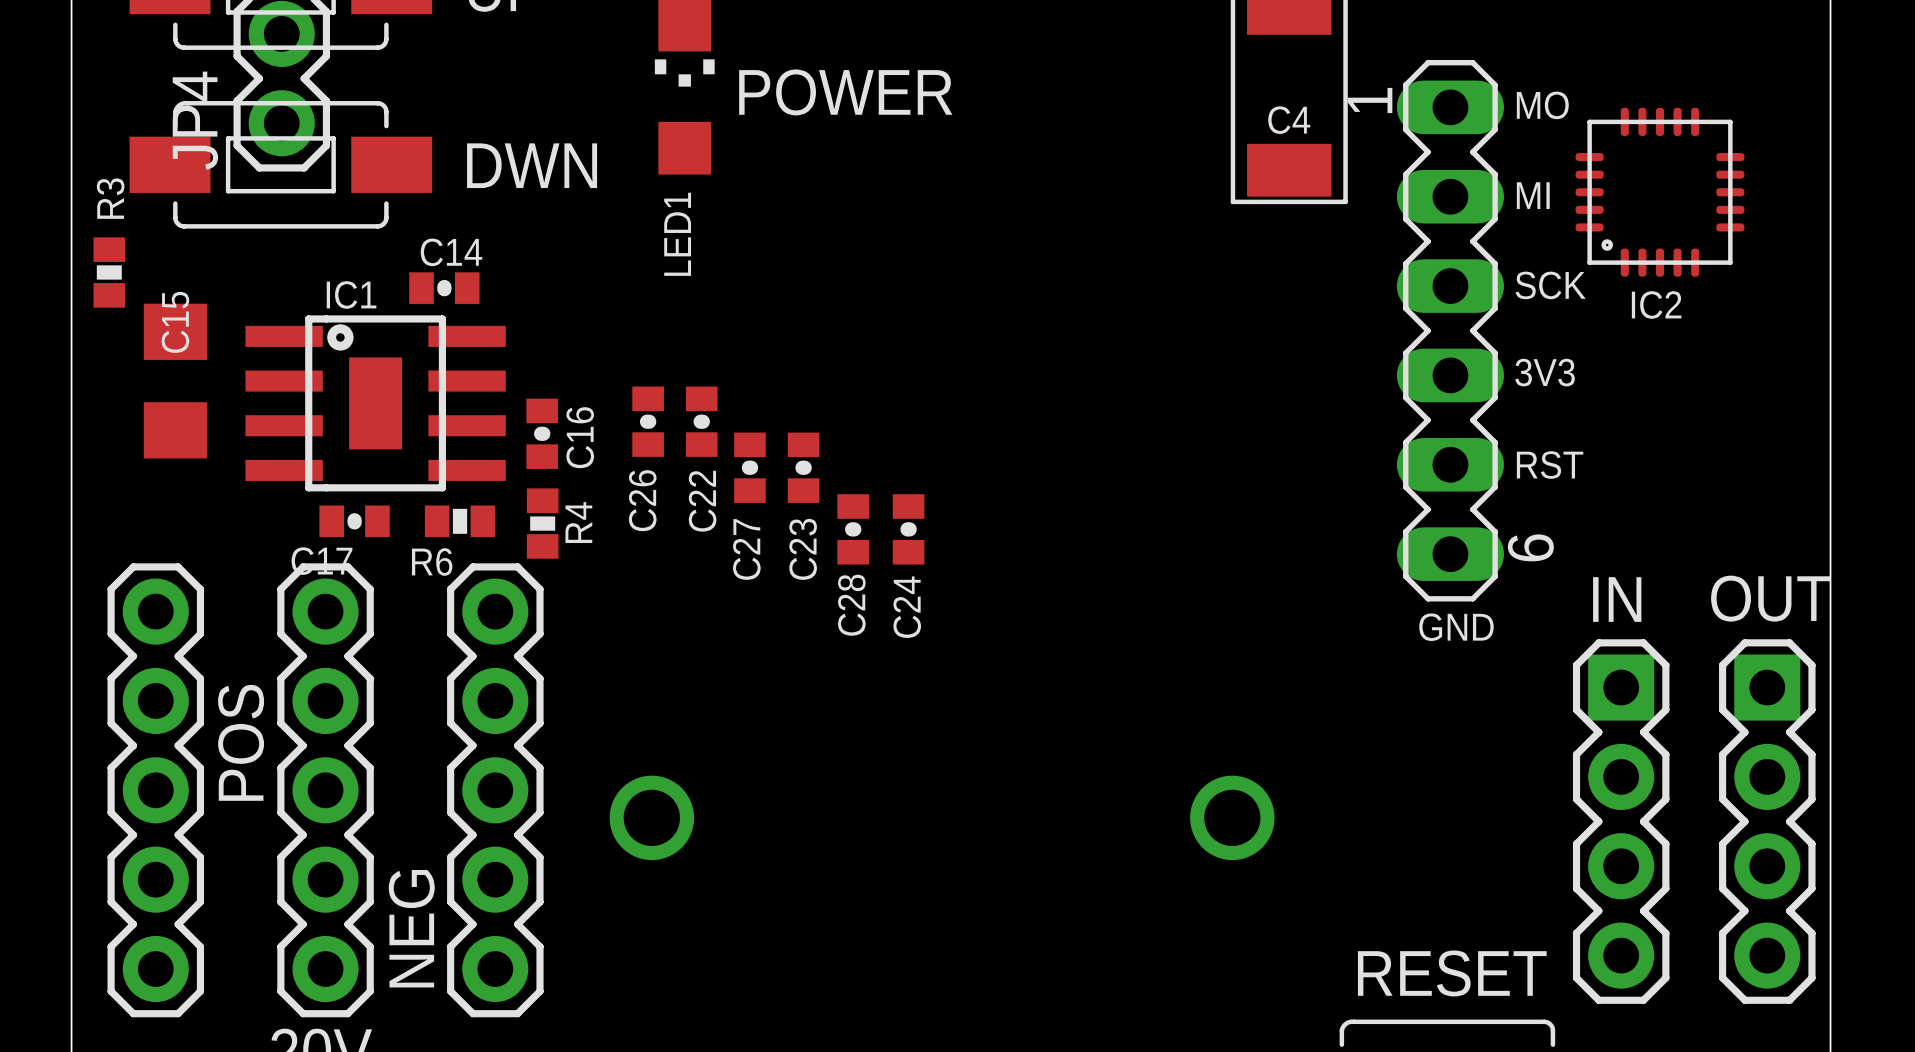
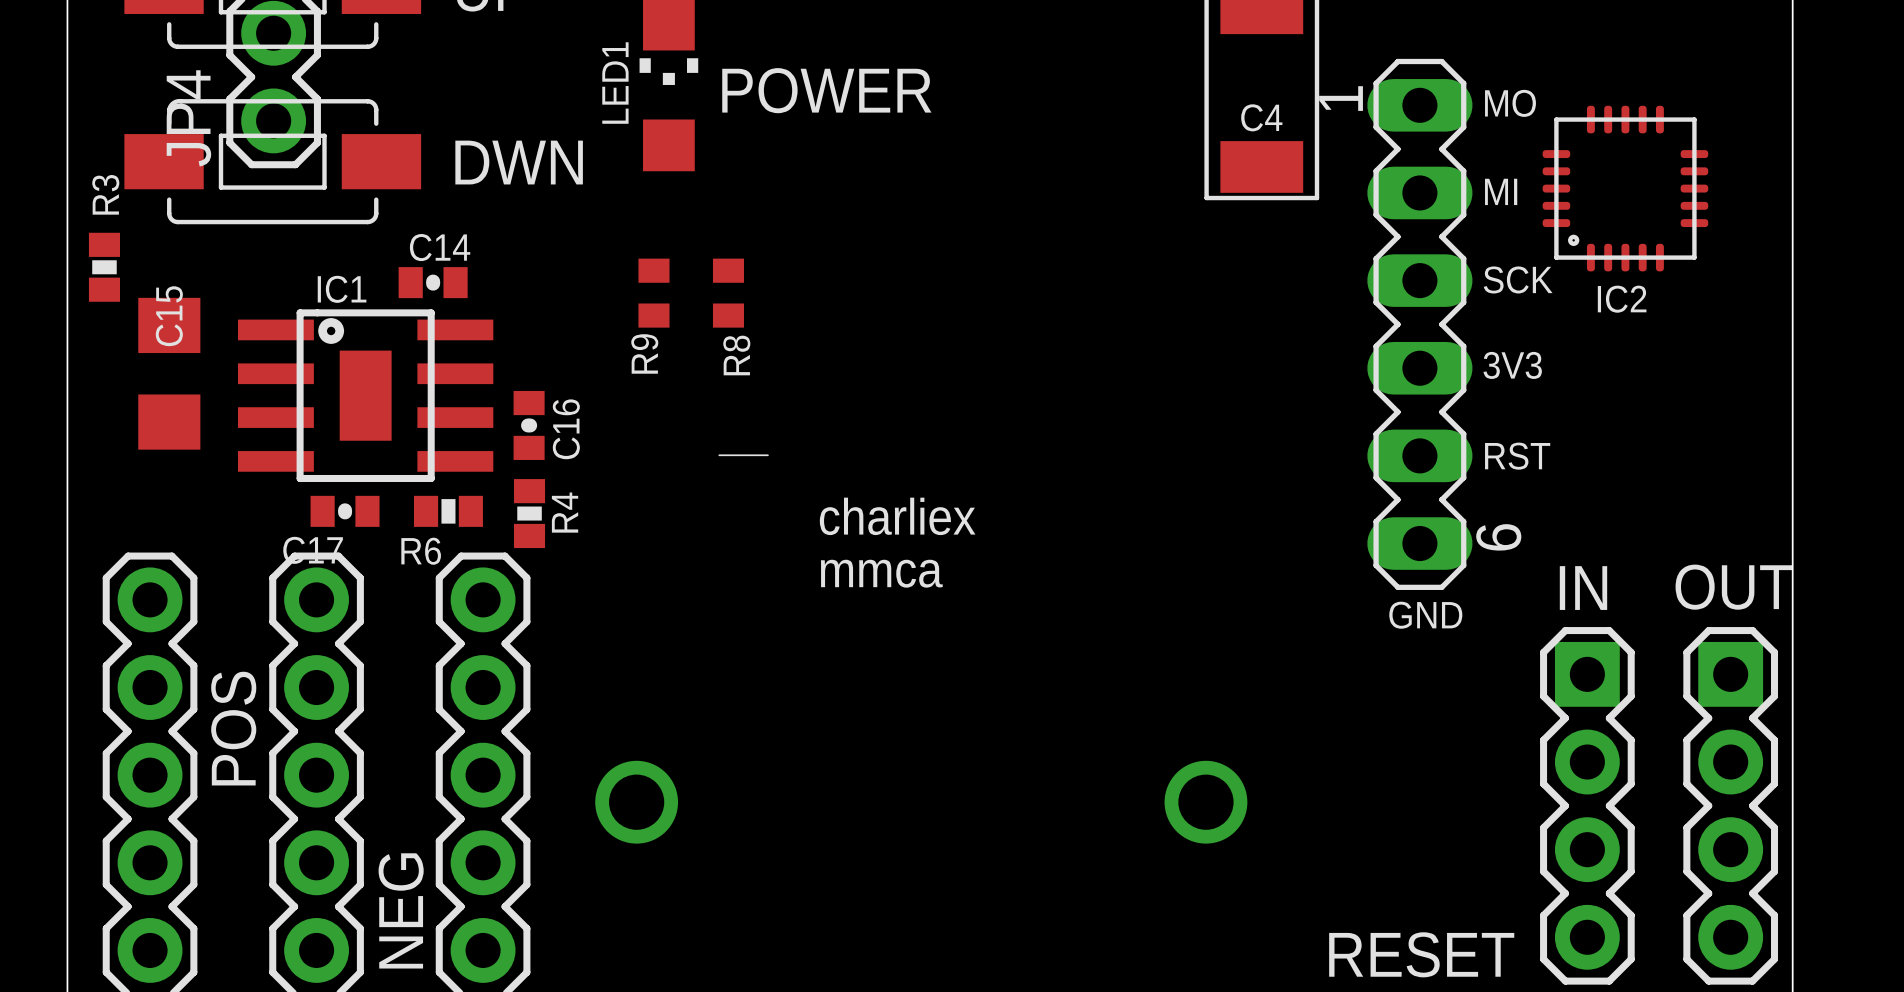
LED1 name position: LED1 (677, 234) -> LED1 (615, 83)
R9: none -> (653, 293)
R8: none -> (728, 293)
C26: (648, 421) -> none
C22: (701, 421) -> none
line: none -> (719, 455) (767, 455)
C27: (749, 467) -> none
C23: (803, 467) -> none
text: none -> charliex (897, 516)
C28: (853, 529) -> none
C24: (908, 529) -> none
text: none -> mmca (881, 573)

